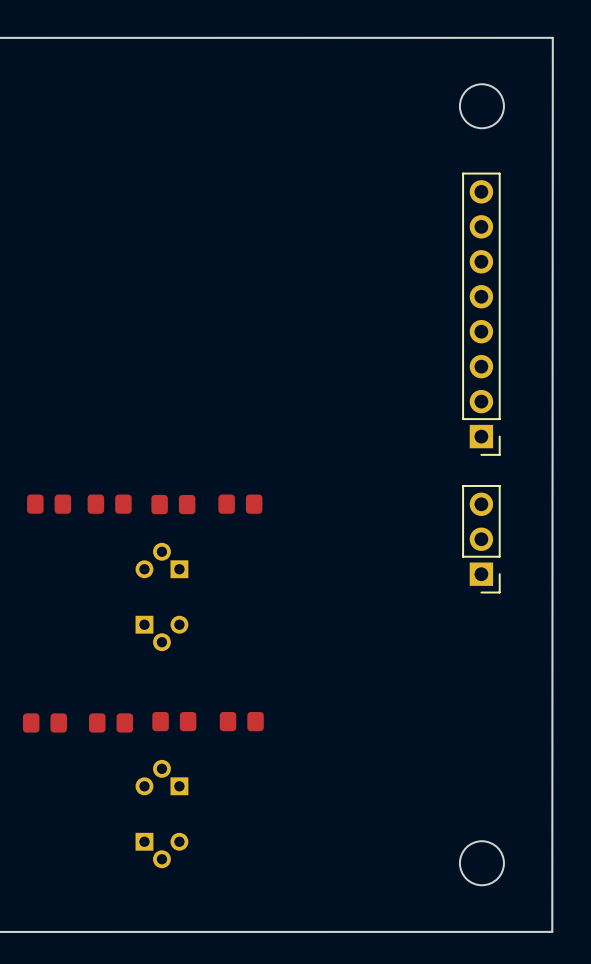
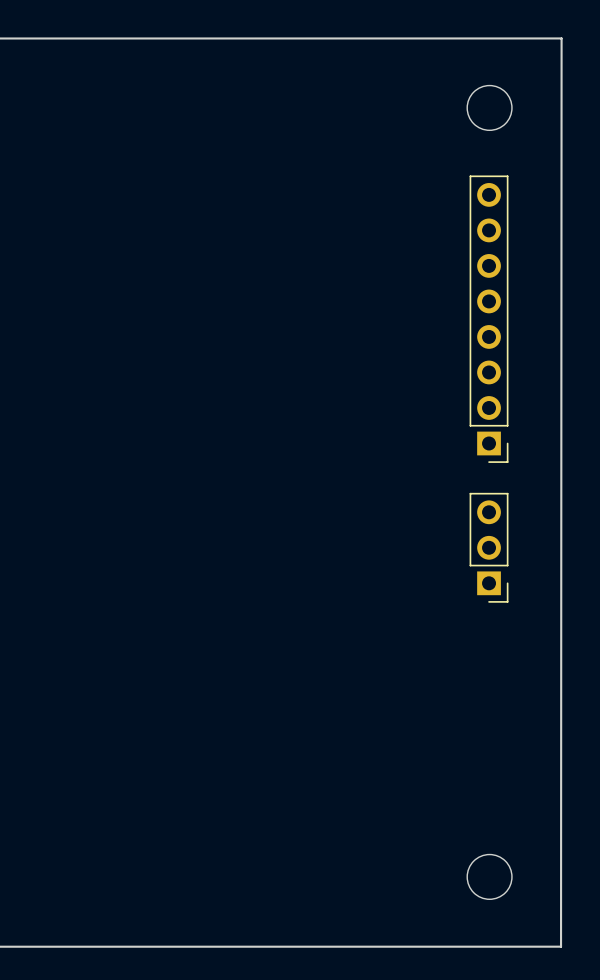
part: (49, 504) -> none
part: (109, 504) -> none
part: (173, 504) -> none
part: (240, 504) -> none
part: (161, 560) -> none
part: (161, 633) -> none
part: (174, 721) -> none
part: (241, 721) -> none
part: (44, 722) -> none
part: (111, 722) -> none
part: (161, 777) -> none
part: (161, 850) -> none

